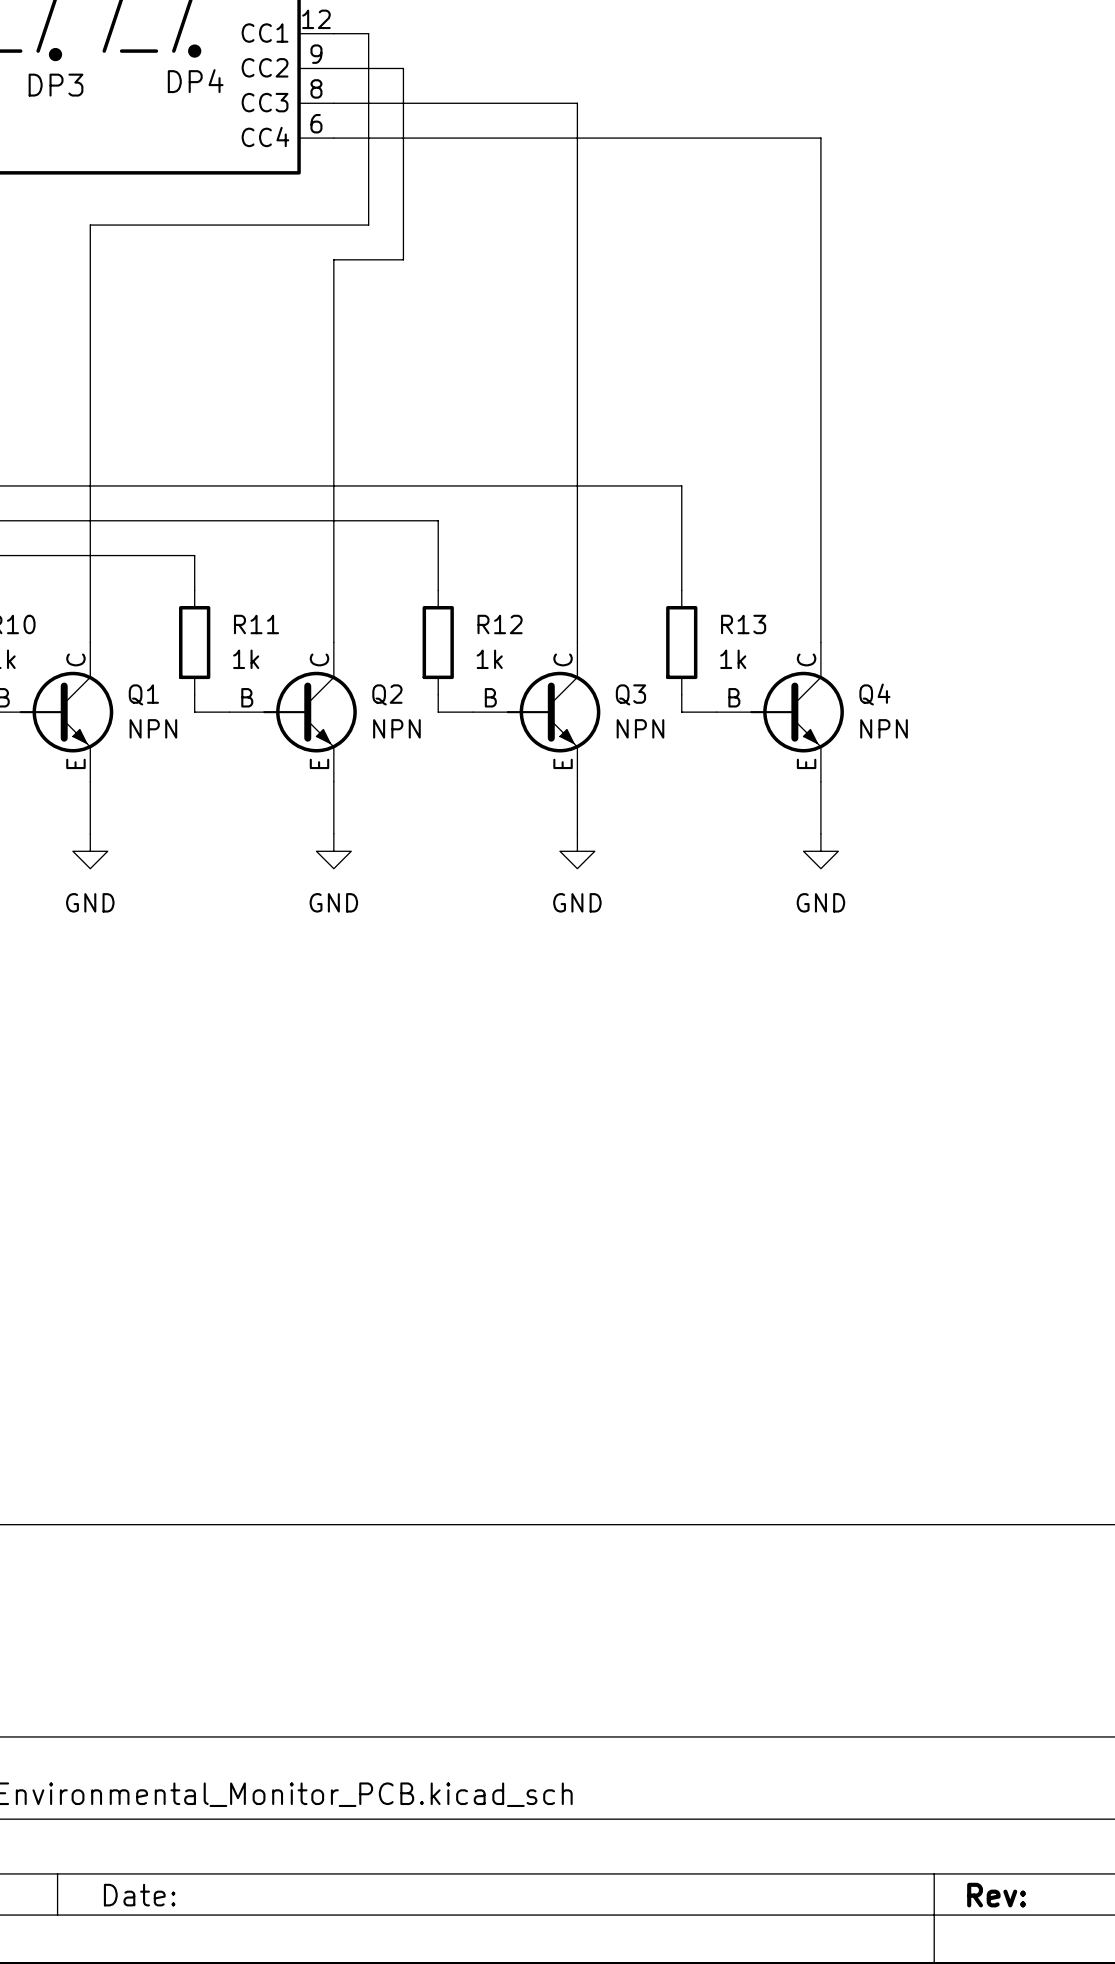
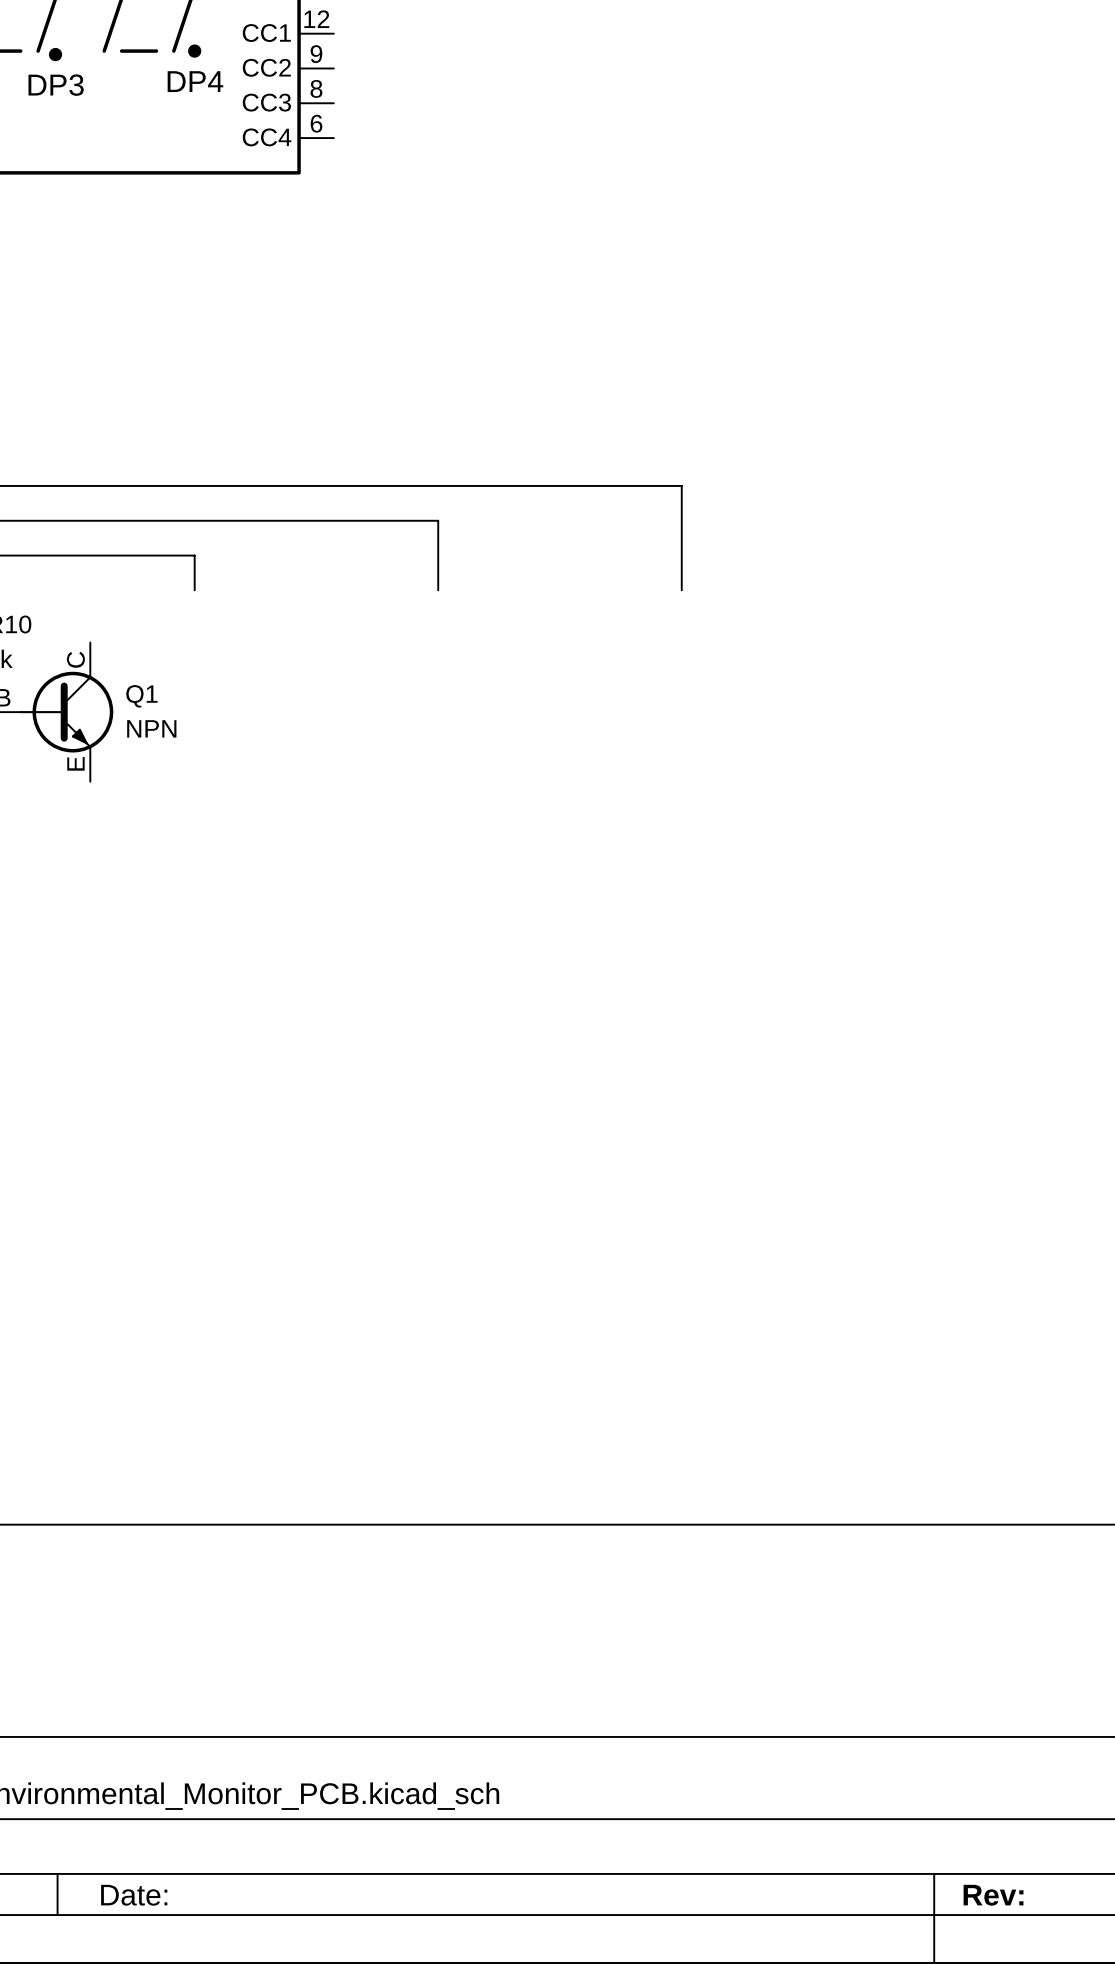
wire: (333, 33) (368, 33) (368, 225) (90, 225) (90, 642) -> none
wire: (333, 68) (403, 68) (403, 259) (333, 259) (333, 642) -> none
wire: (333, 103) (577, 103) (577, 642) -> none
wire: (333, 138) (820, 138) (820, 642) -> none
R11: 1k (194, 642) -> none
R12: 1k (438, 642) -> none
R13: 1k (681, 642) -> none
wire: (194, 694) (194, 712) (229, 712) -> none
wire: (438, 694) (438, 712) (473, 712) -> none
wire: (681, 694) (681, 712) (716, 712) -> none
Q2: NPN (293, 712) -> none
Q3: NPN (536, 712) -> none
Q4: NPN (780, 712) -> none
wire: (90, 781) (90, 833) -> none
wire: (333, 781) (333, 833) -> none
wire: (577, 781) (577, 833) -> none
wire: (820, 781) (820, 833) -> none
power symbol: GND (90, 851) -> none
power symbol: GND (333, 851) -> none
power symbol: GND (577, 851) -> none
power symbol: GND (820, 851) -> none

